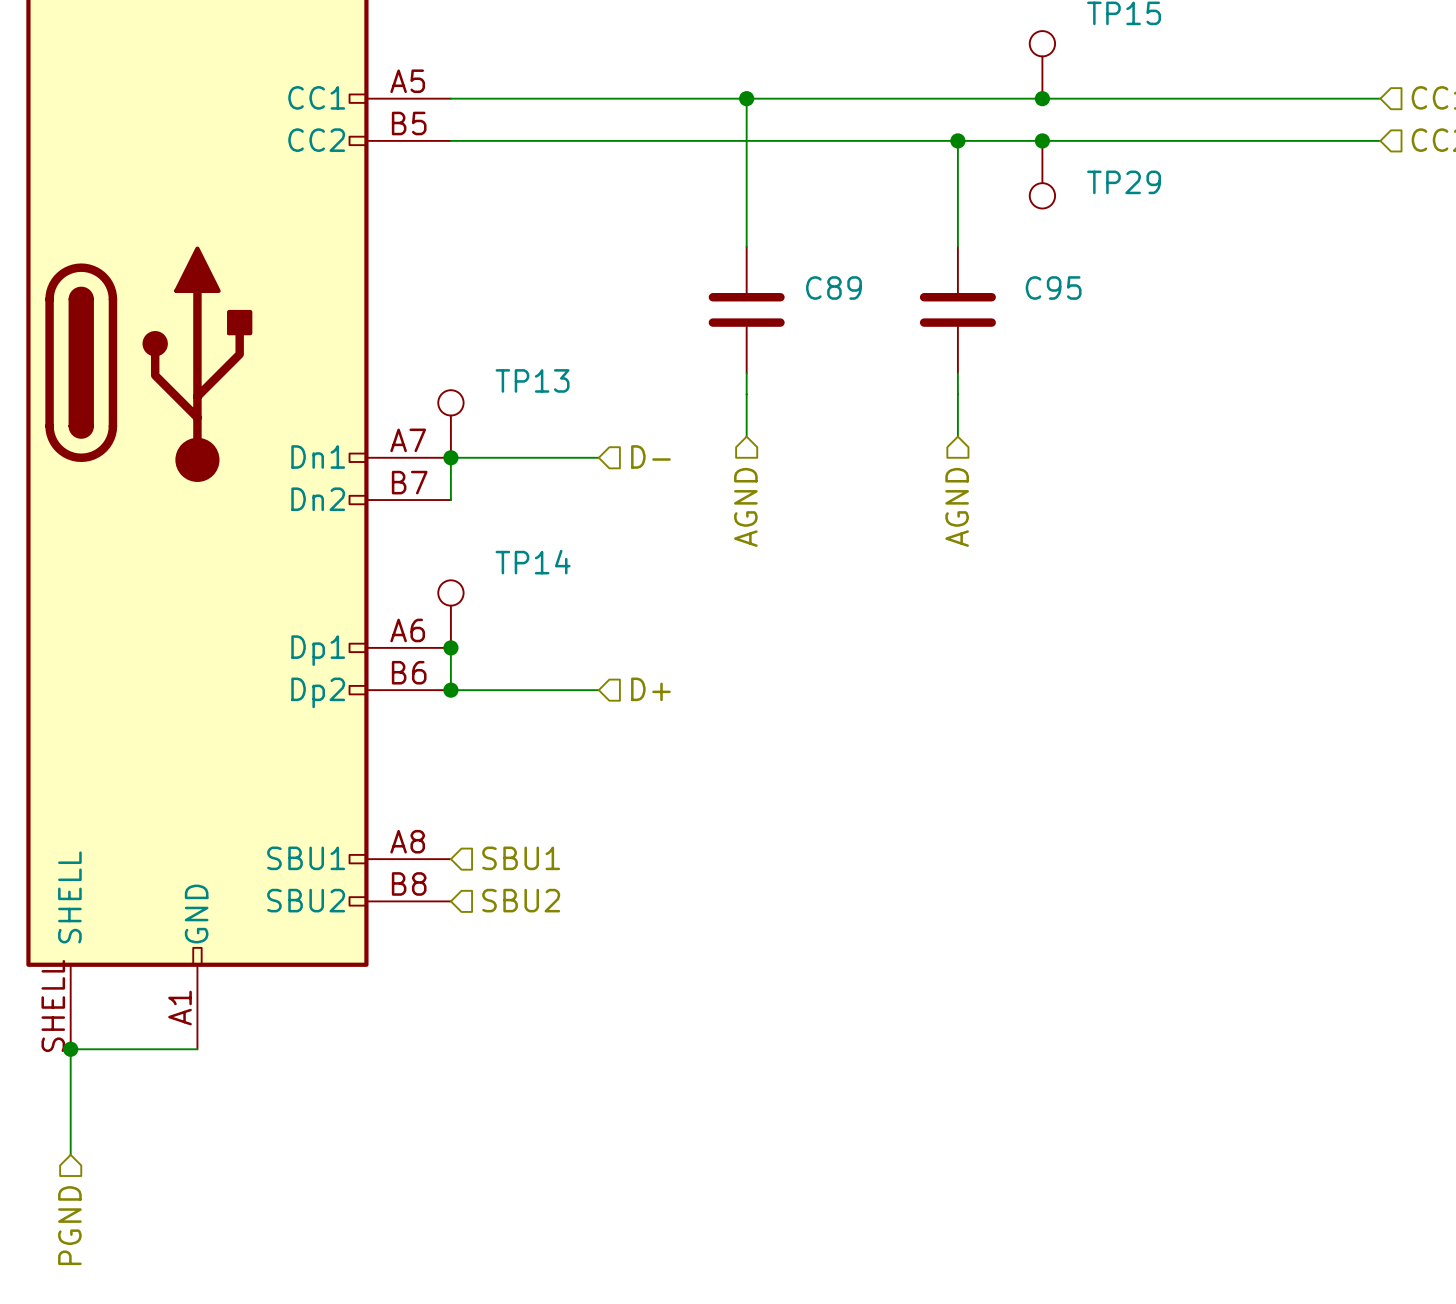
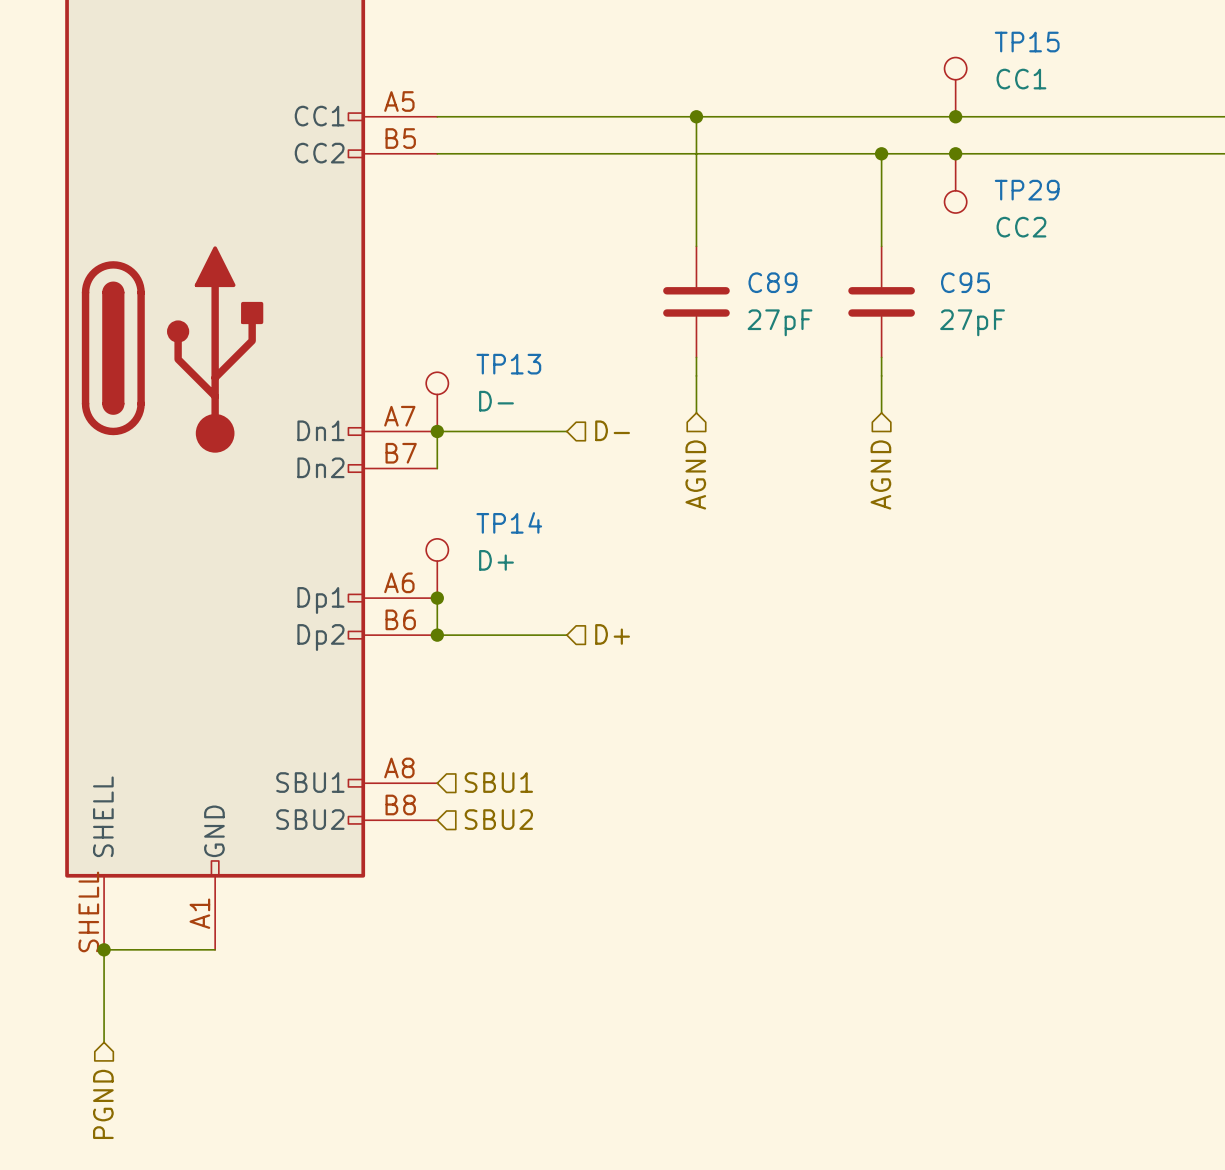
TP15 value: none -> CC1 (1021, 79)
TP29 value: none -> CC2 (1021, 227)
C89 value: none -> 27pF (780, 322)
C95 value: none -> 27pF (972, 322)
TP13 value: none -> D- (496, 401)
TP14 value: none -> D+ (496, 560)

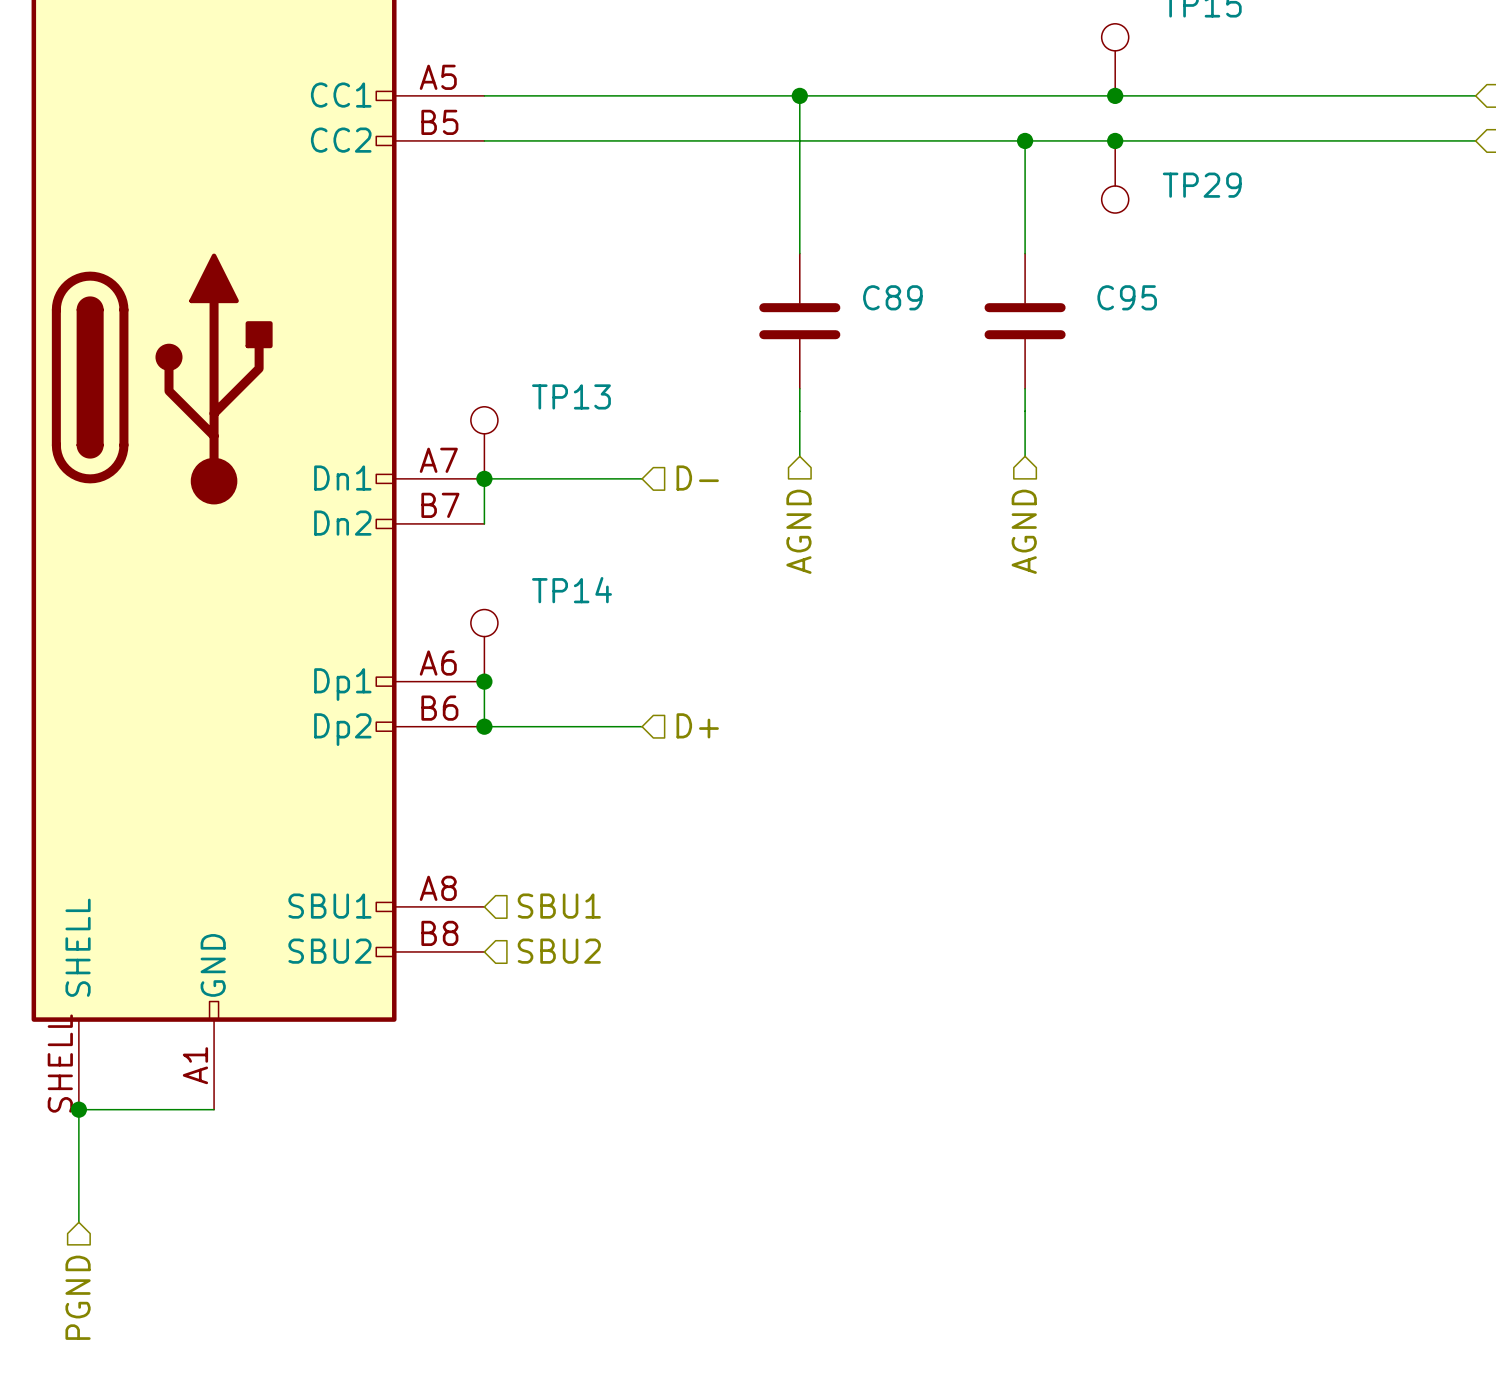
TP15 value: CC1 (1021, 79) -> none
TP29 value: CC2 (1021, 227) -> none
C89 value: 27pF (780, 322) -> none
C95 value: 27pF (972, 322) -> none
TP13 value: D- (496, 401) -> none
TP14 value: D+ (496, 560) -> none

